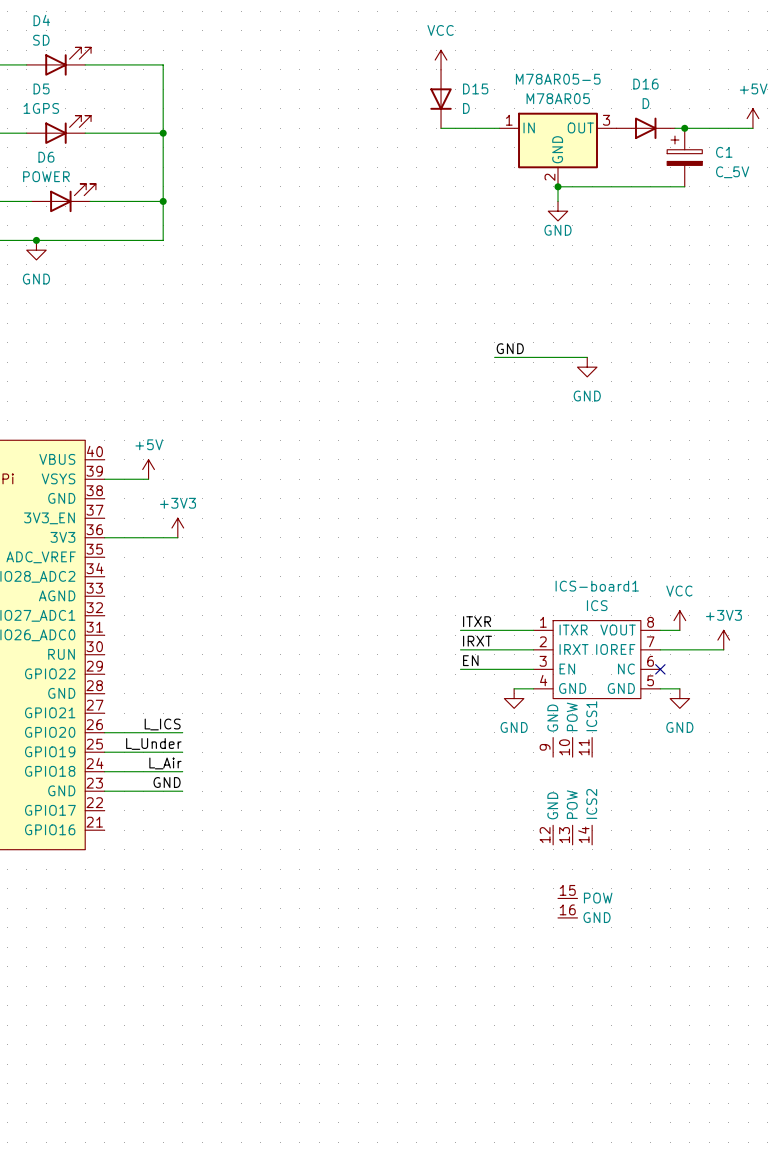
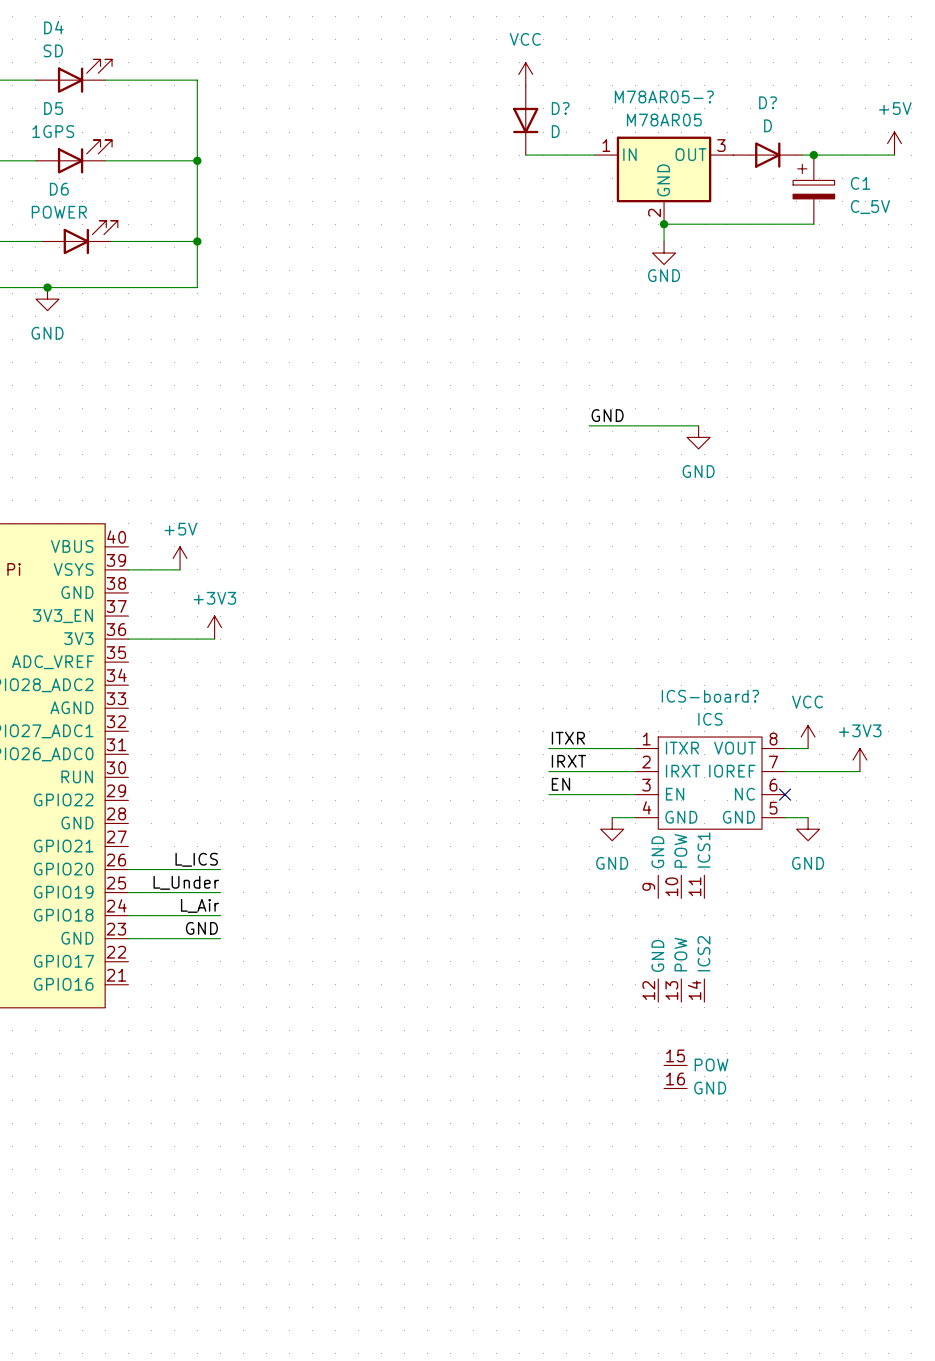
M78AR05-5 name: M78AR05-5 (558, 79) -> M78AR05-? (664, 97)
D16 name: D16 (645, 84) -> D? (768, 102)
D15 name: D15 (475, 88) -> D? (560, 108)
ICS-board1 name: ICS-board1 (597, 586) -> ICS-board? (710, 696)

